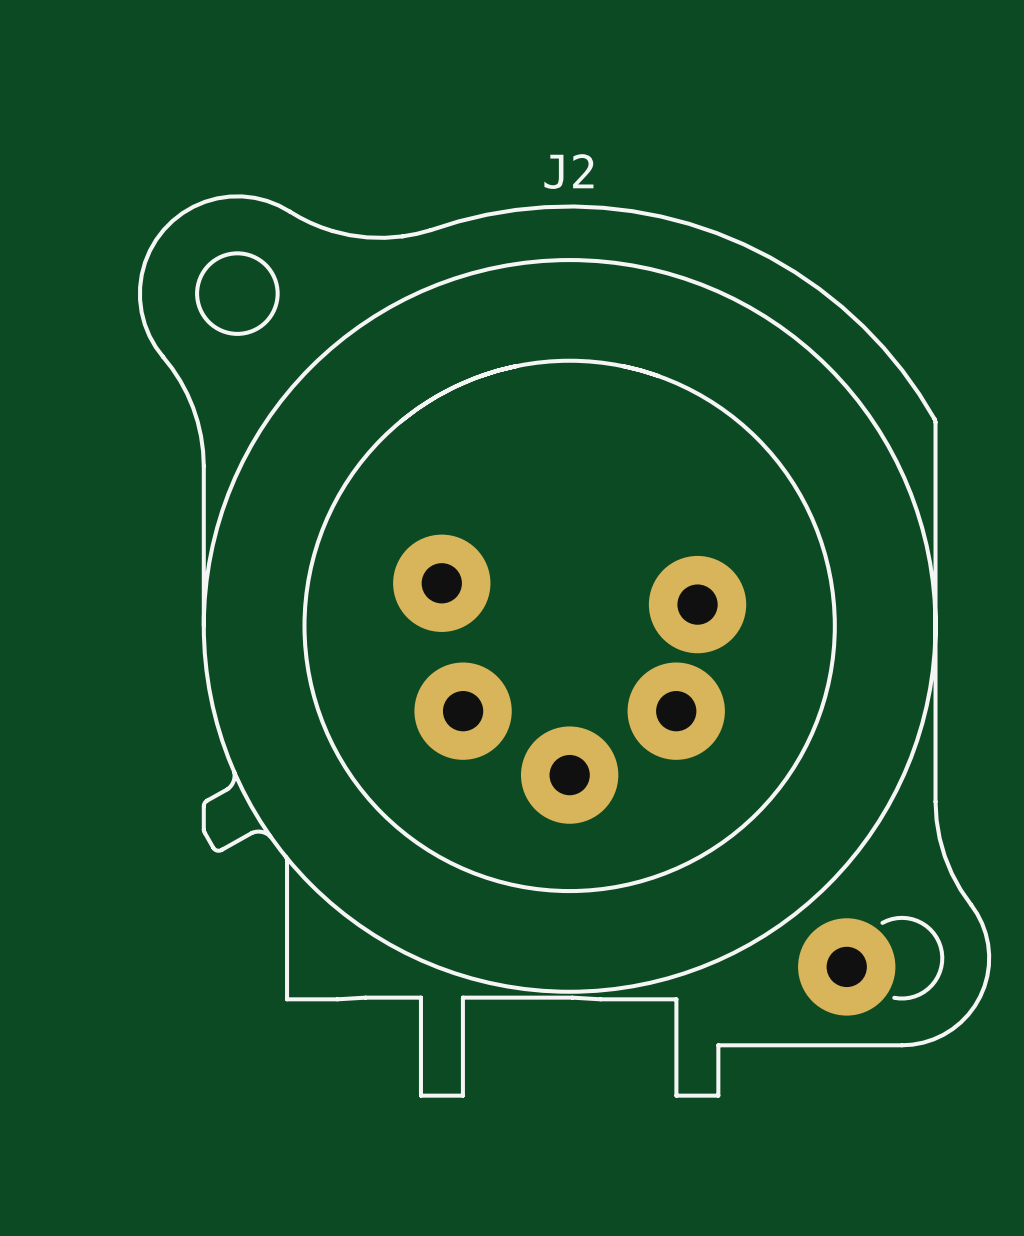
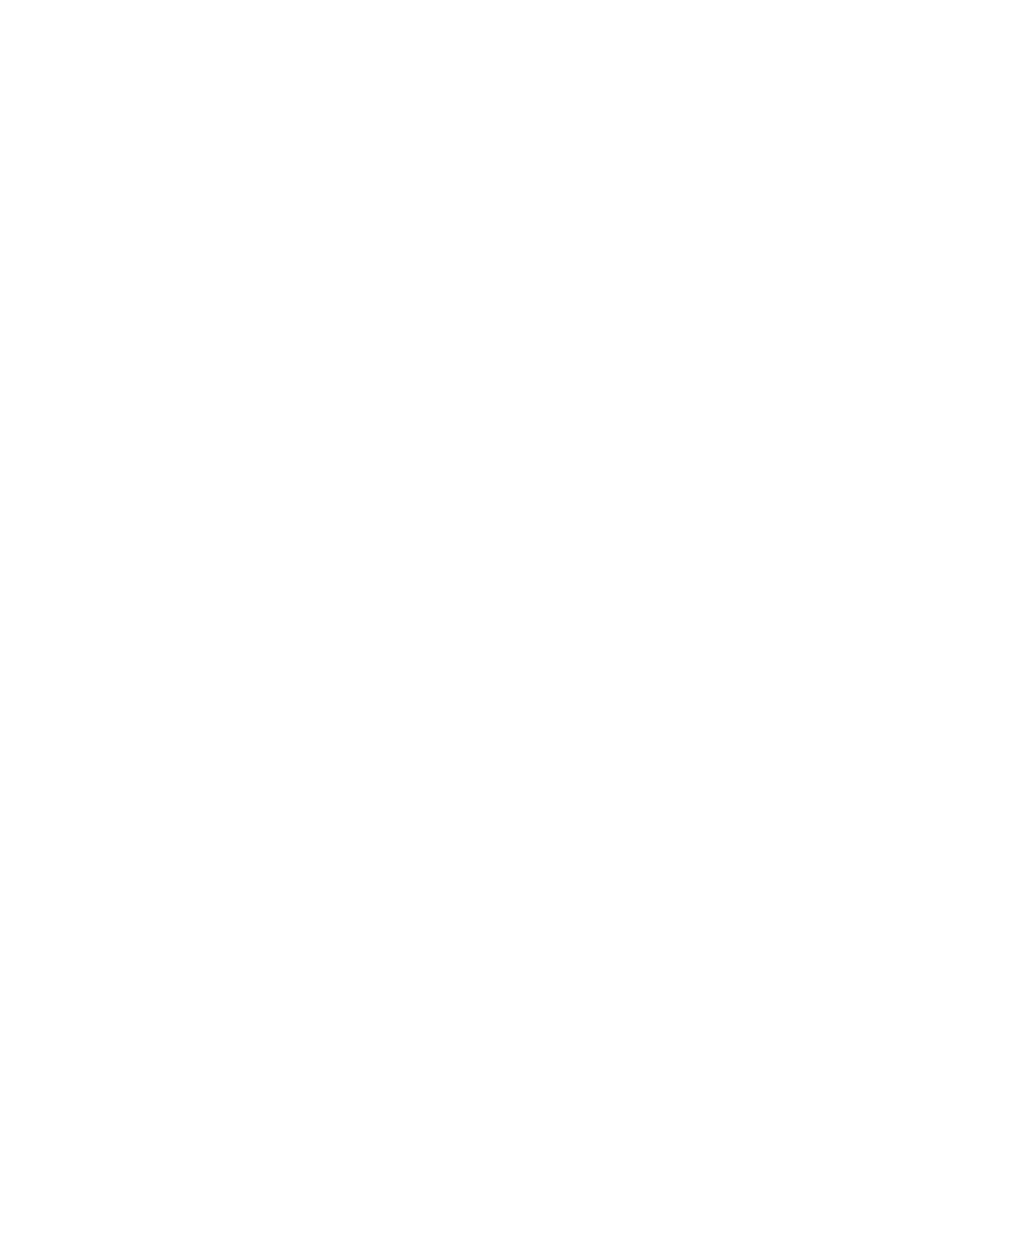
J2: (564, 646) -> none

